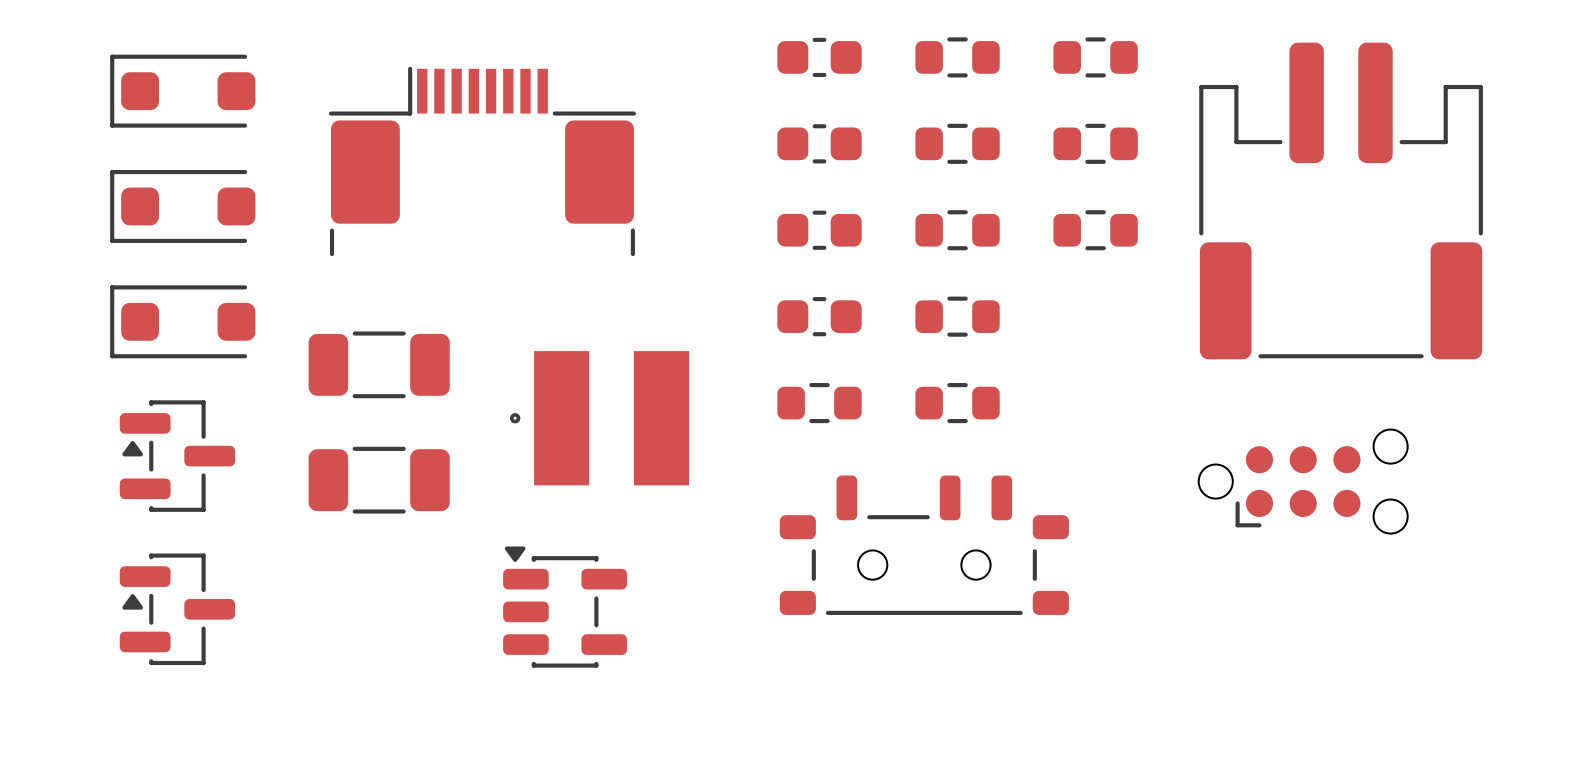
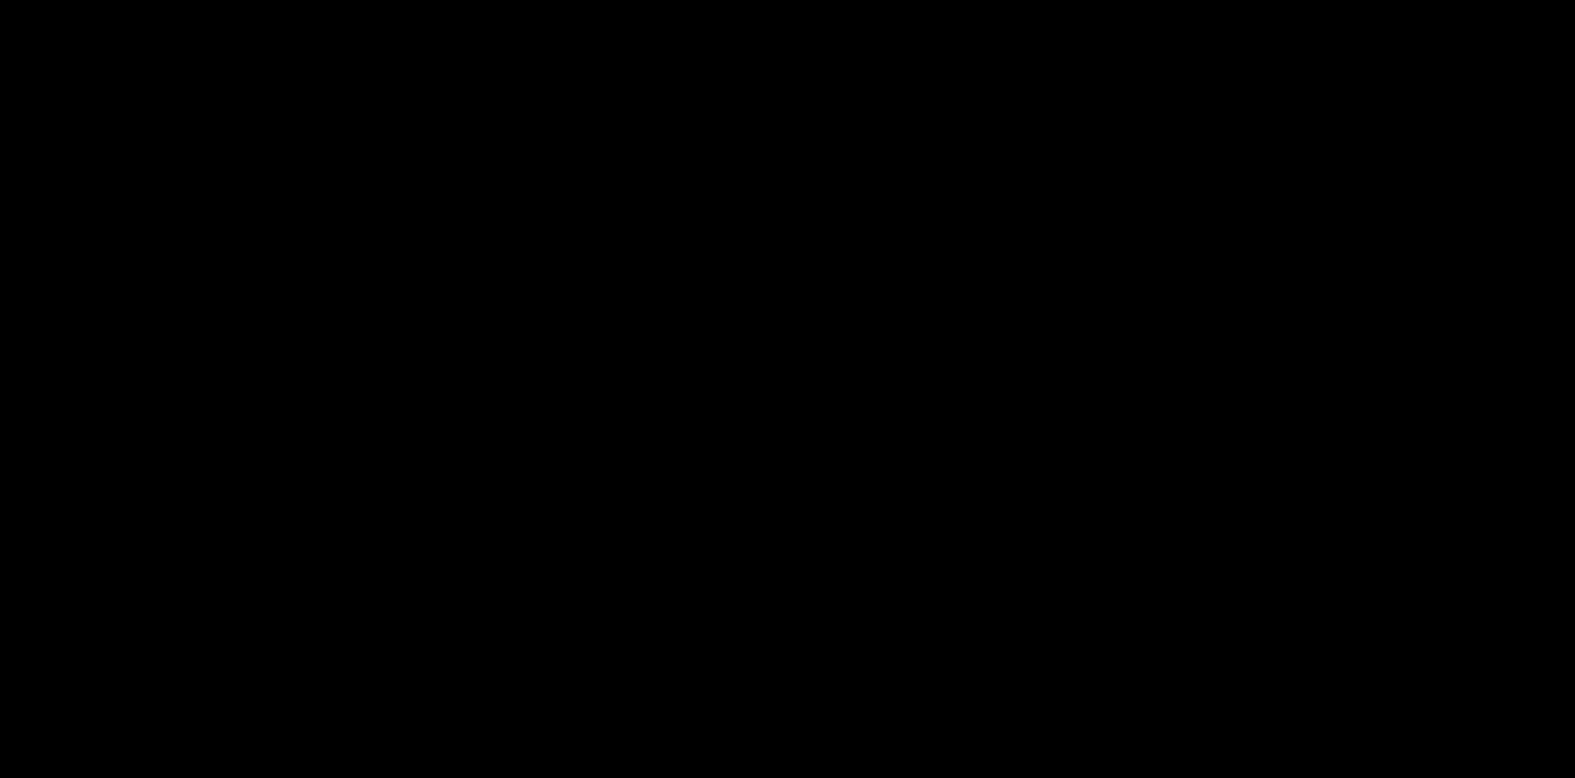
part: (819, 57) -> none
part: (957, 57) -> none
part: (1095, 57) -> none
part: (182, 91) -> none
part: (819, 143) -> none
part: (957, 143) -> none
part: (1095, 143) -> none
part: (482, 161) -> none
part: (1341, 200) -> none
part: (182, 206) -> none
part: (819, 230) -> none
part: (957, 230) -> none
part: (1095, 230) -> none
part: (819, 316) -> none
part: (957, 316) -> none
part: (182, 321) -> none
part: (379, 364) -> none
part: (819, 403) -> none
part: (957, 403) -> none
part: (599, 418) -> none
part: (177, 456) -> none
part: (379, 480) -> none
part: (1303, 481) -> none
part: (924, 545) -> none
part: (565, 607) -> none
part: (177, 609) -> none

